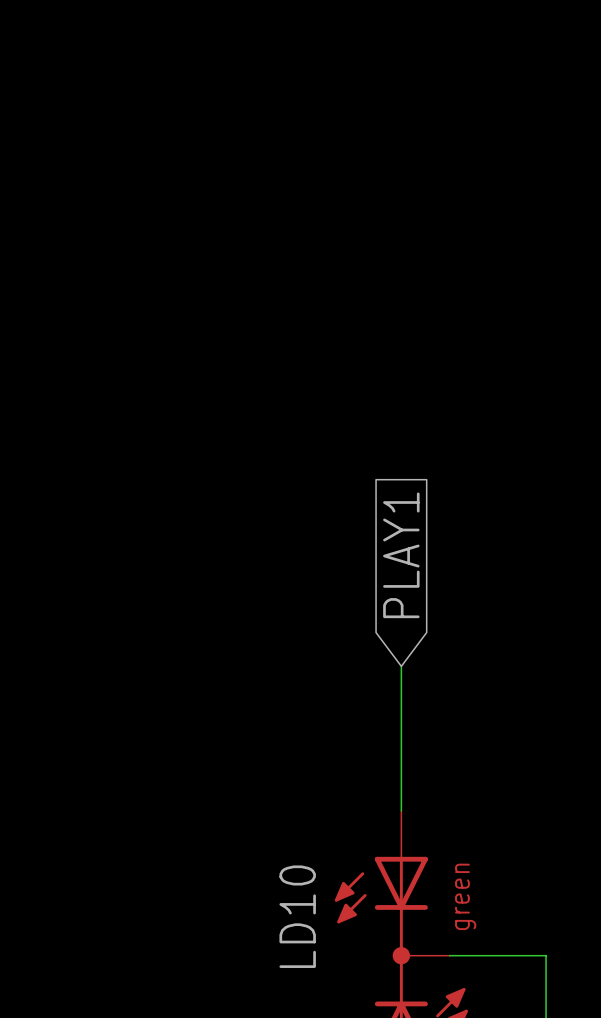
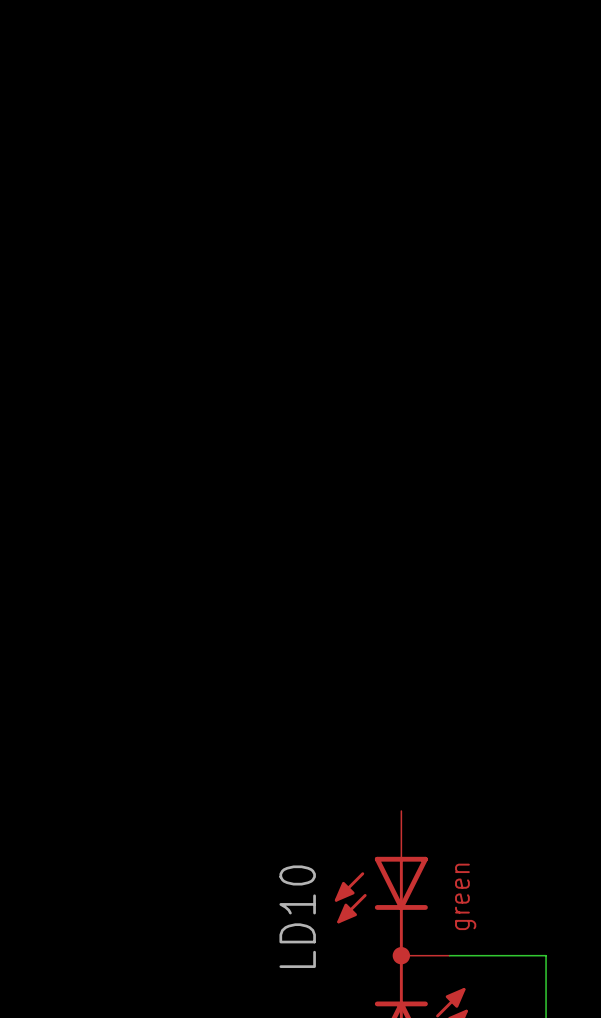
global label: PLAY1 (401, 555) -> none
wire: (401, 666) (401, 811) -> none

